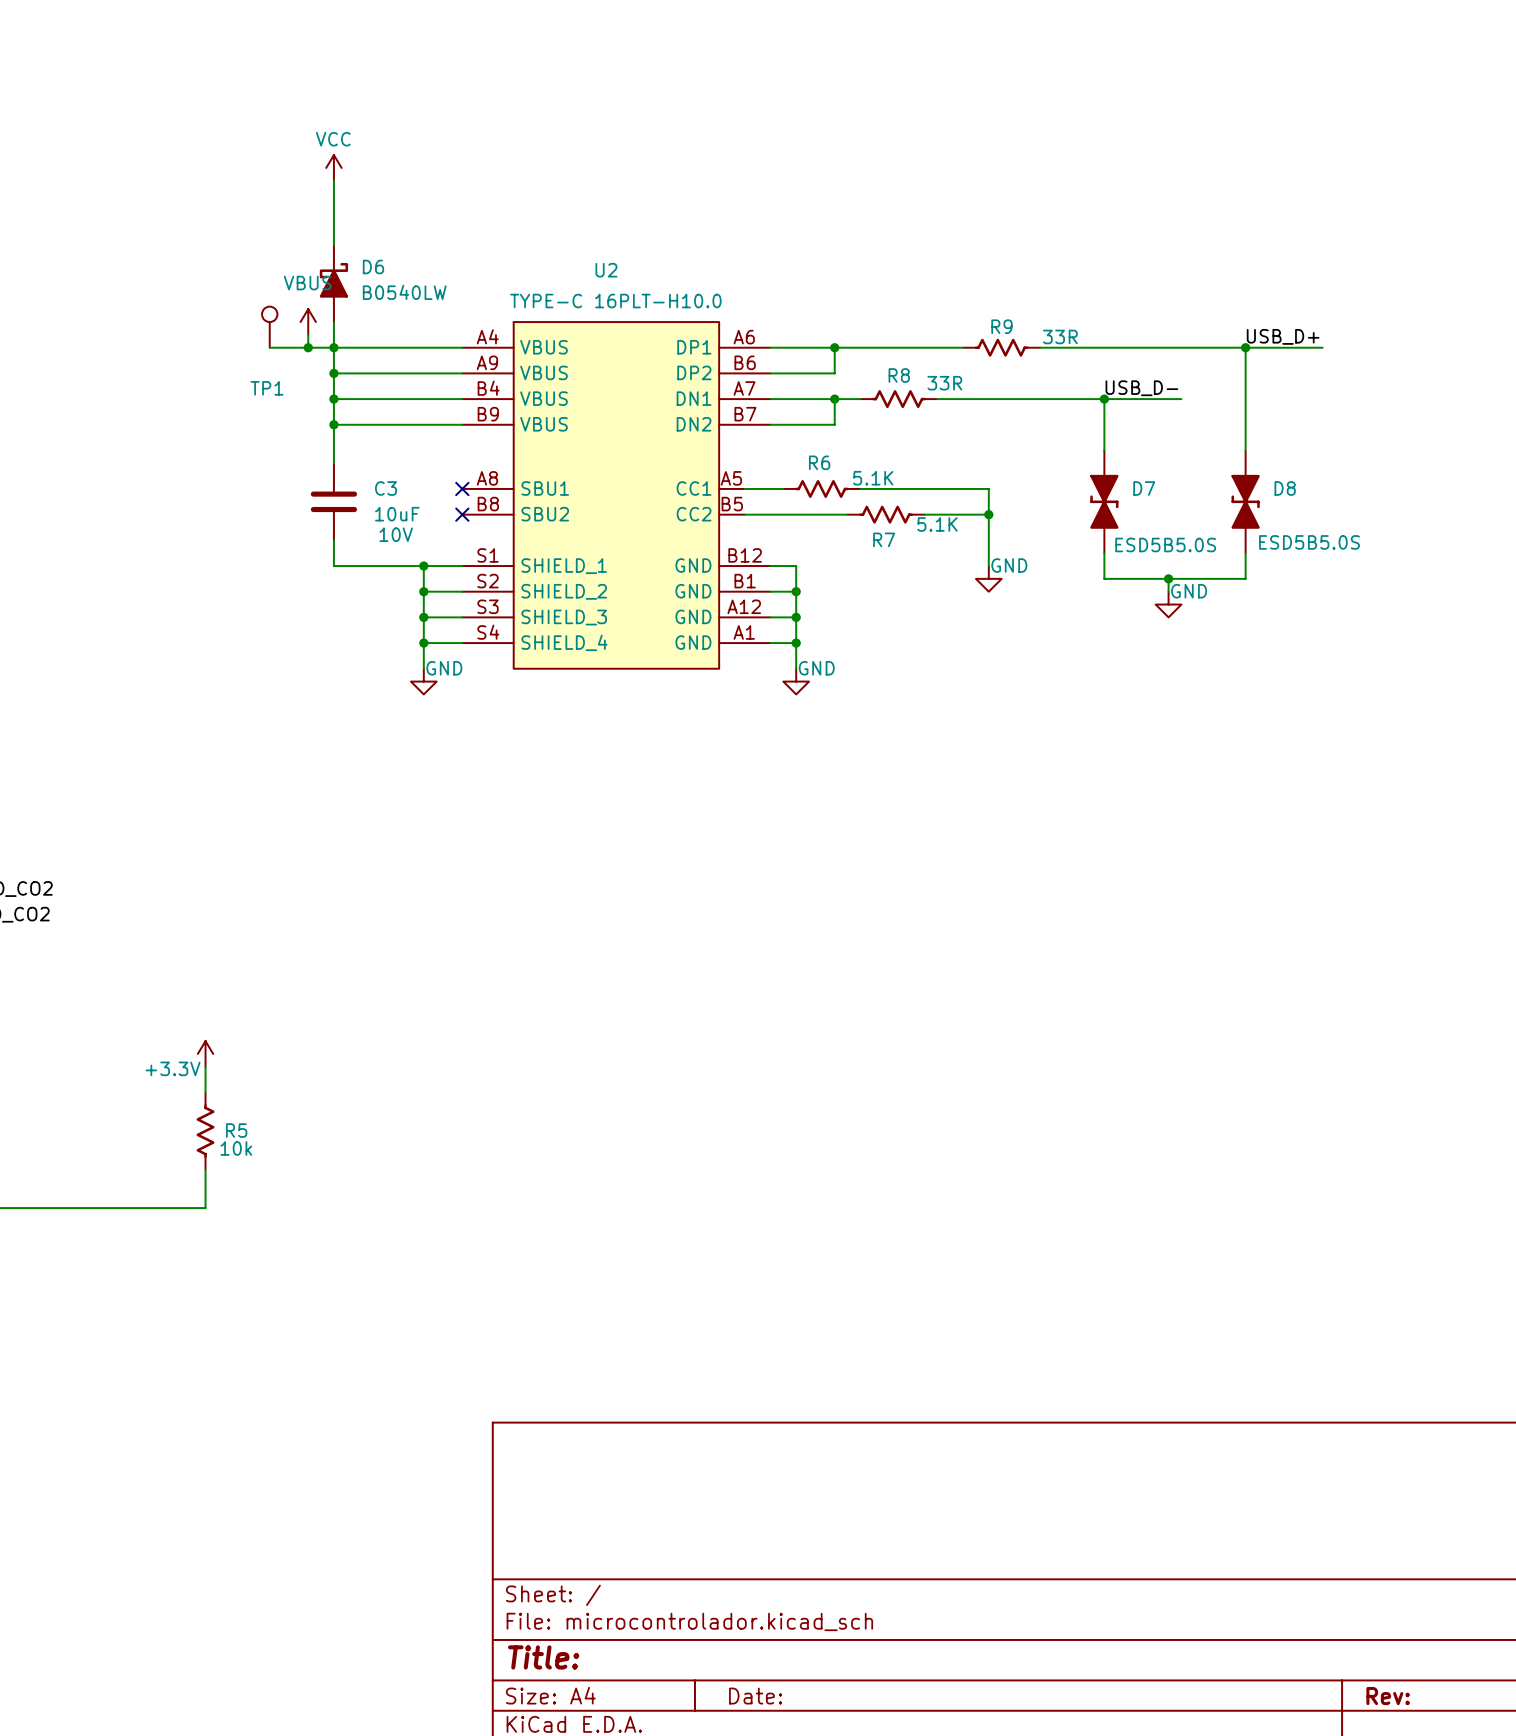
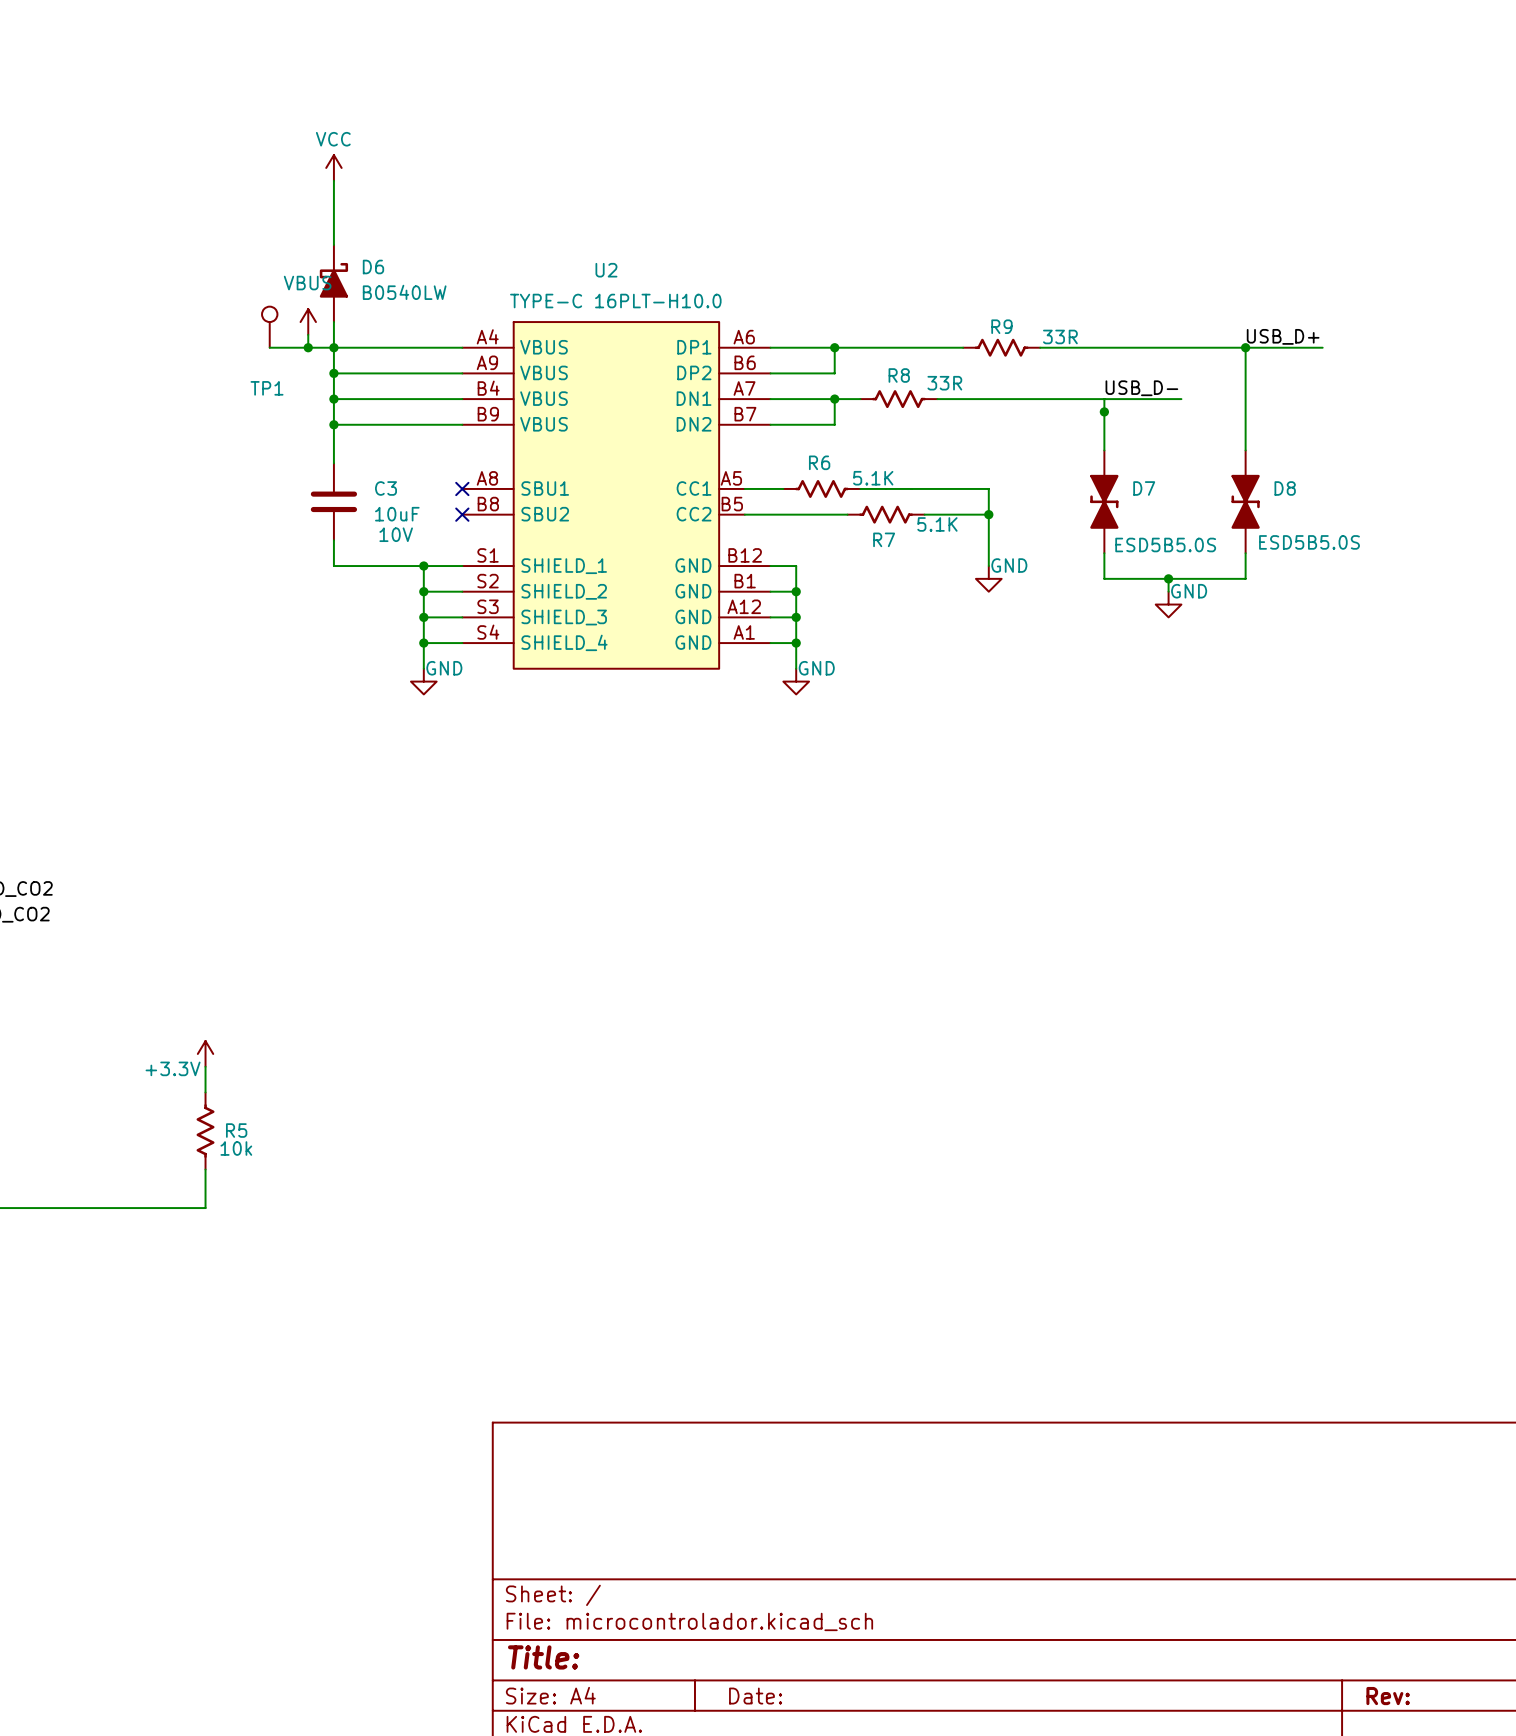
junction position: (1104, 399) -> (1104, 411)

